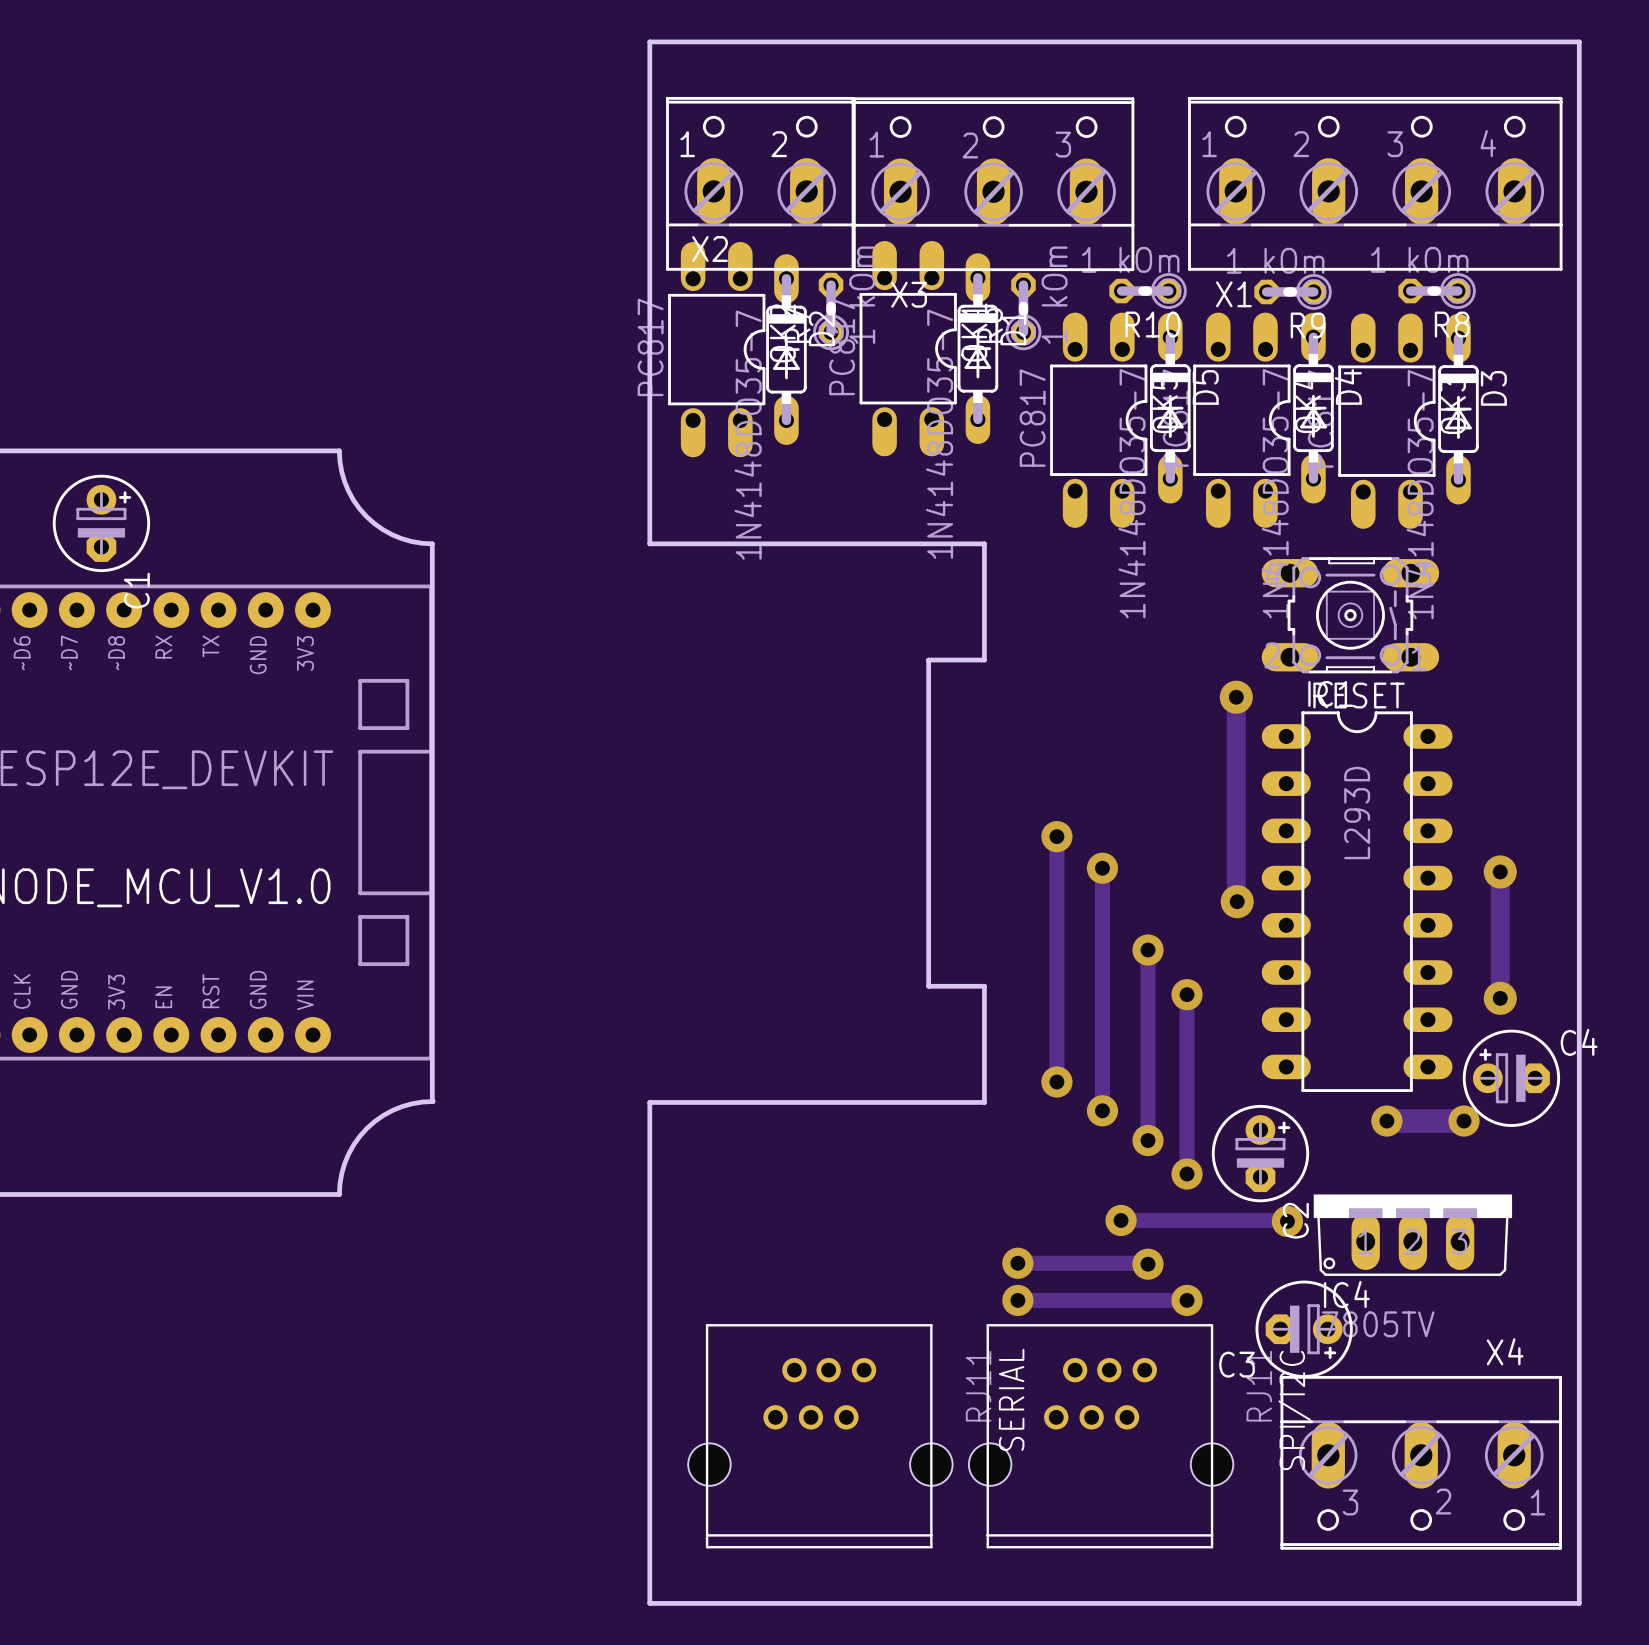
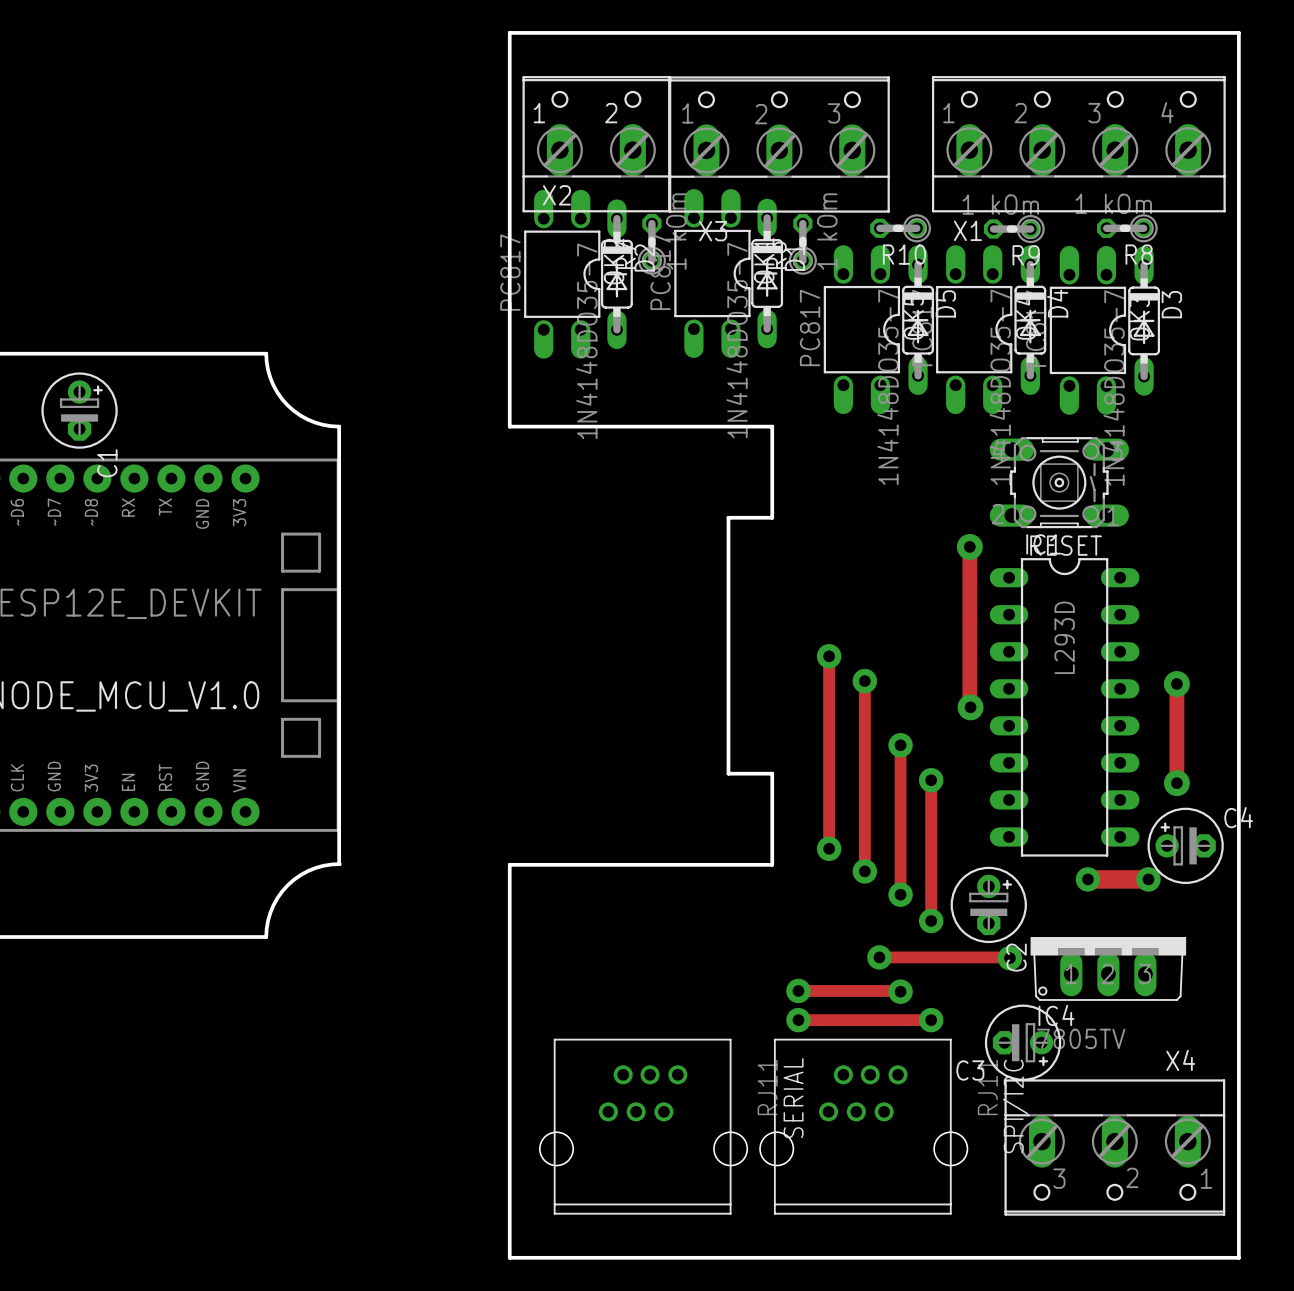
R10 value: 1 kOm (1130, 259) -> none

